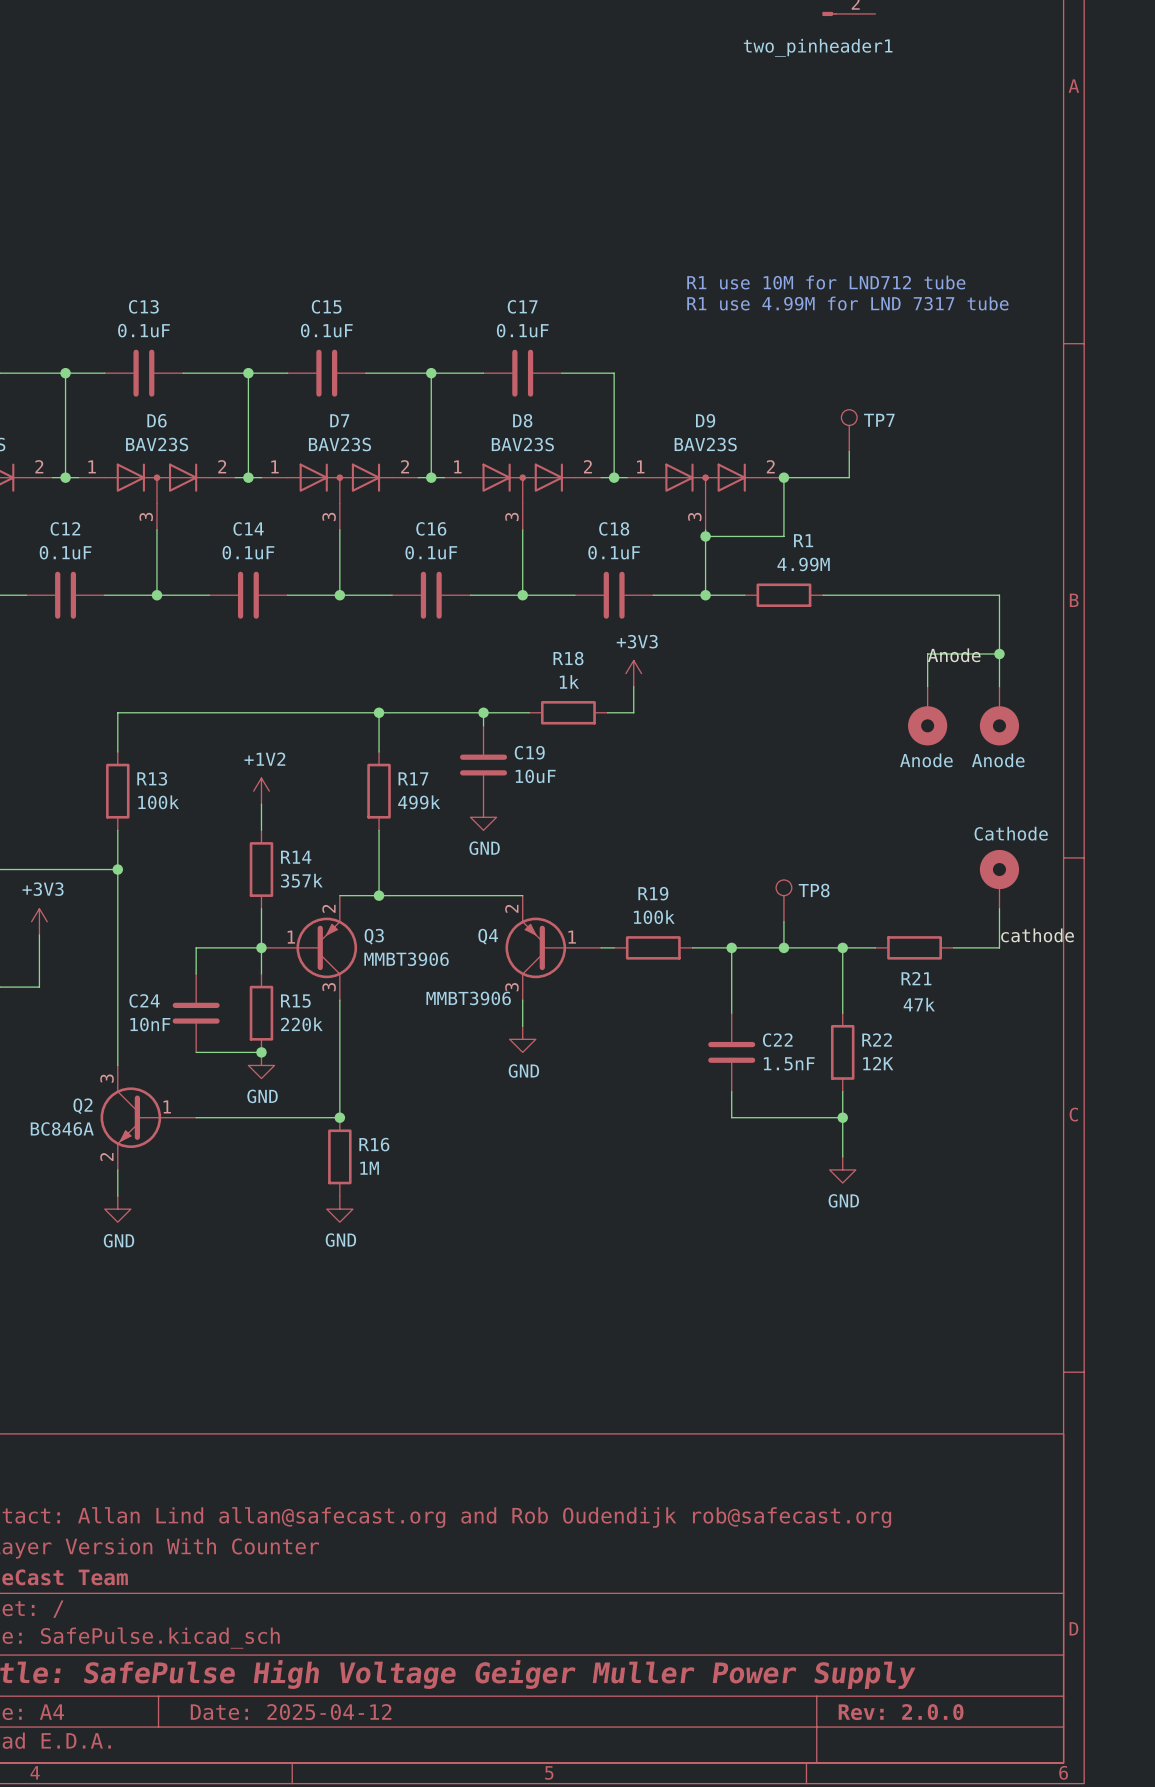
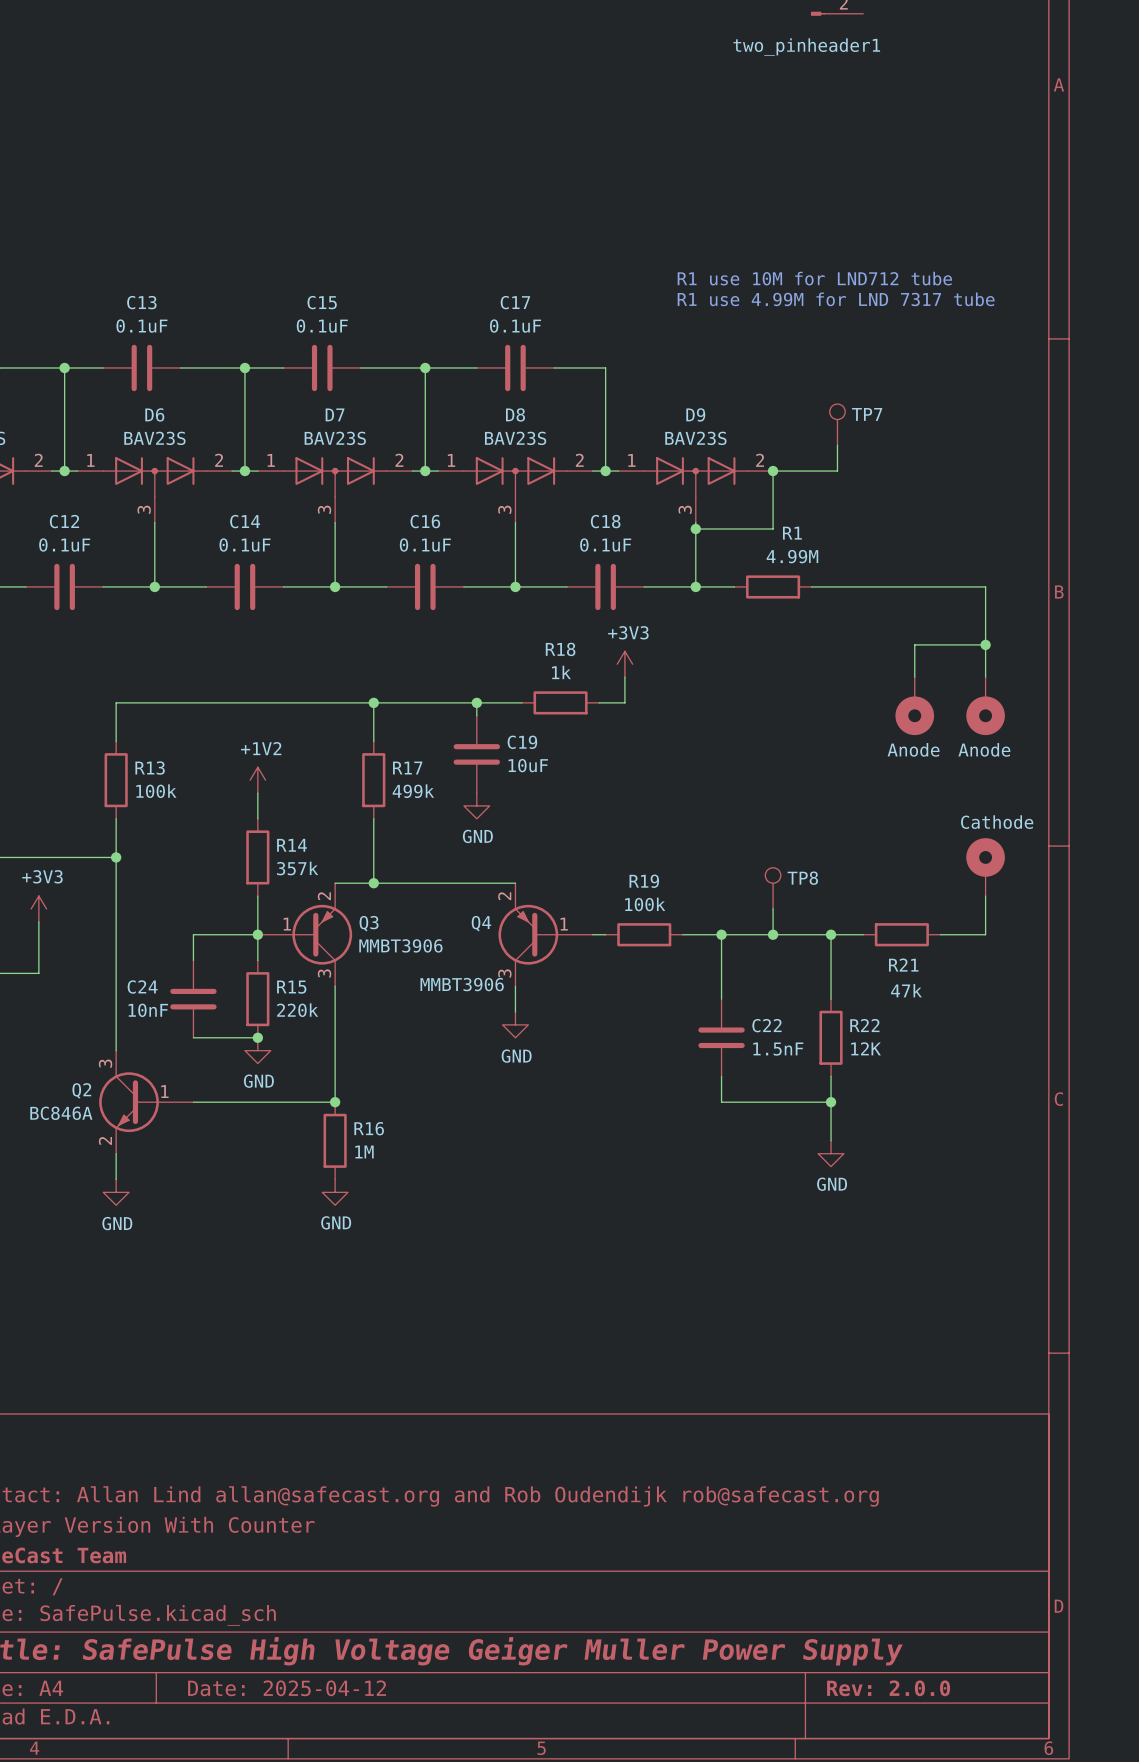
label: Anode (954, 655) -> none
label: cathode (1037, 935) -> none

